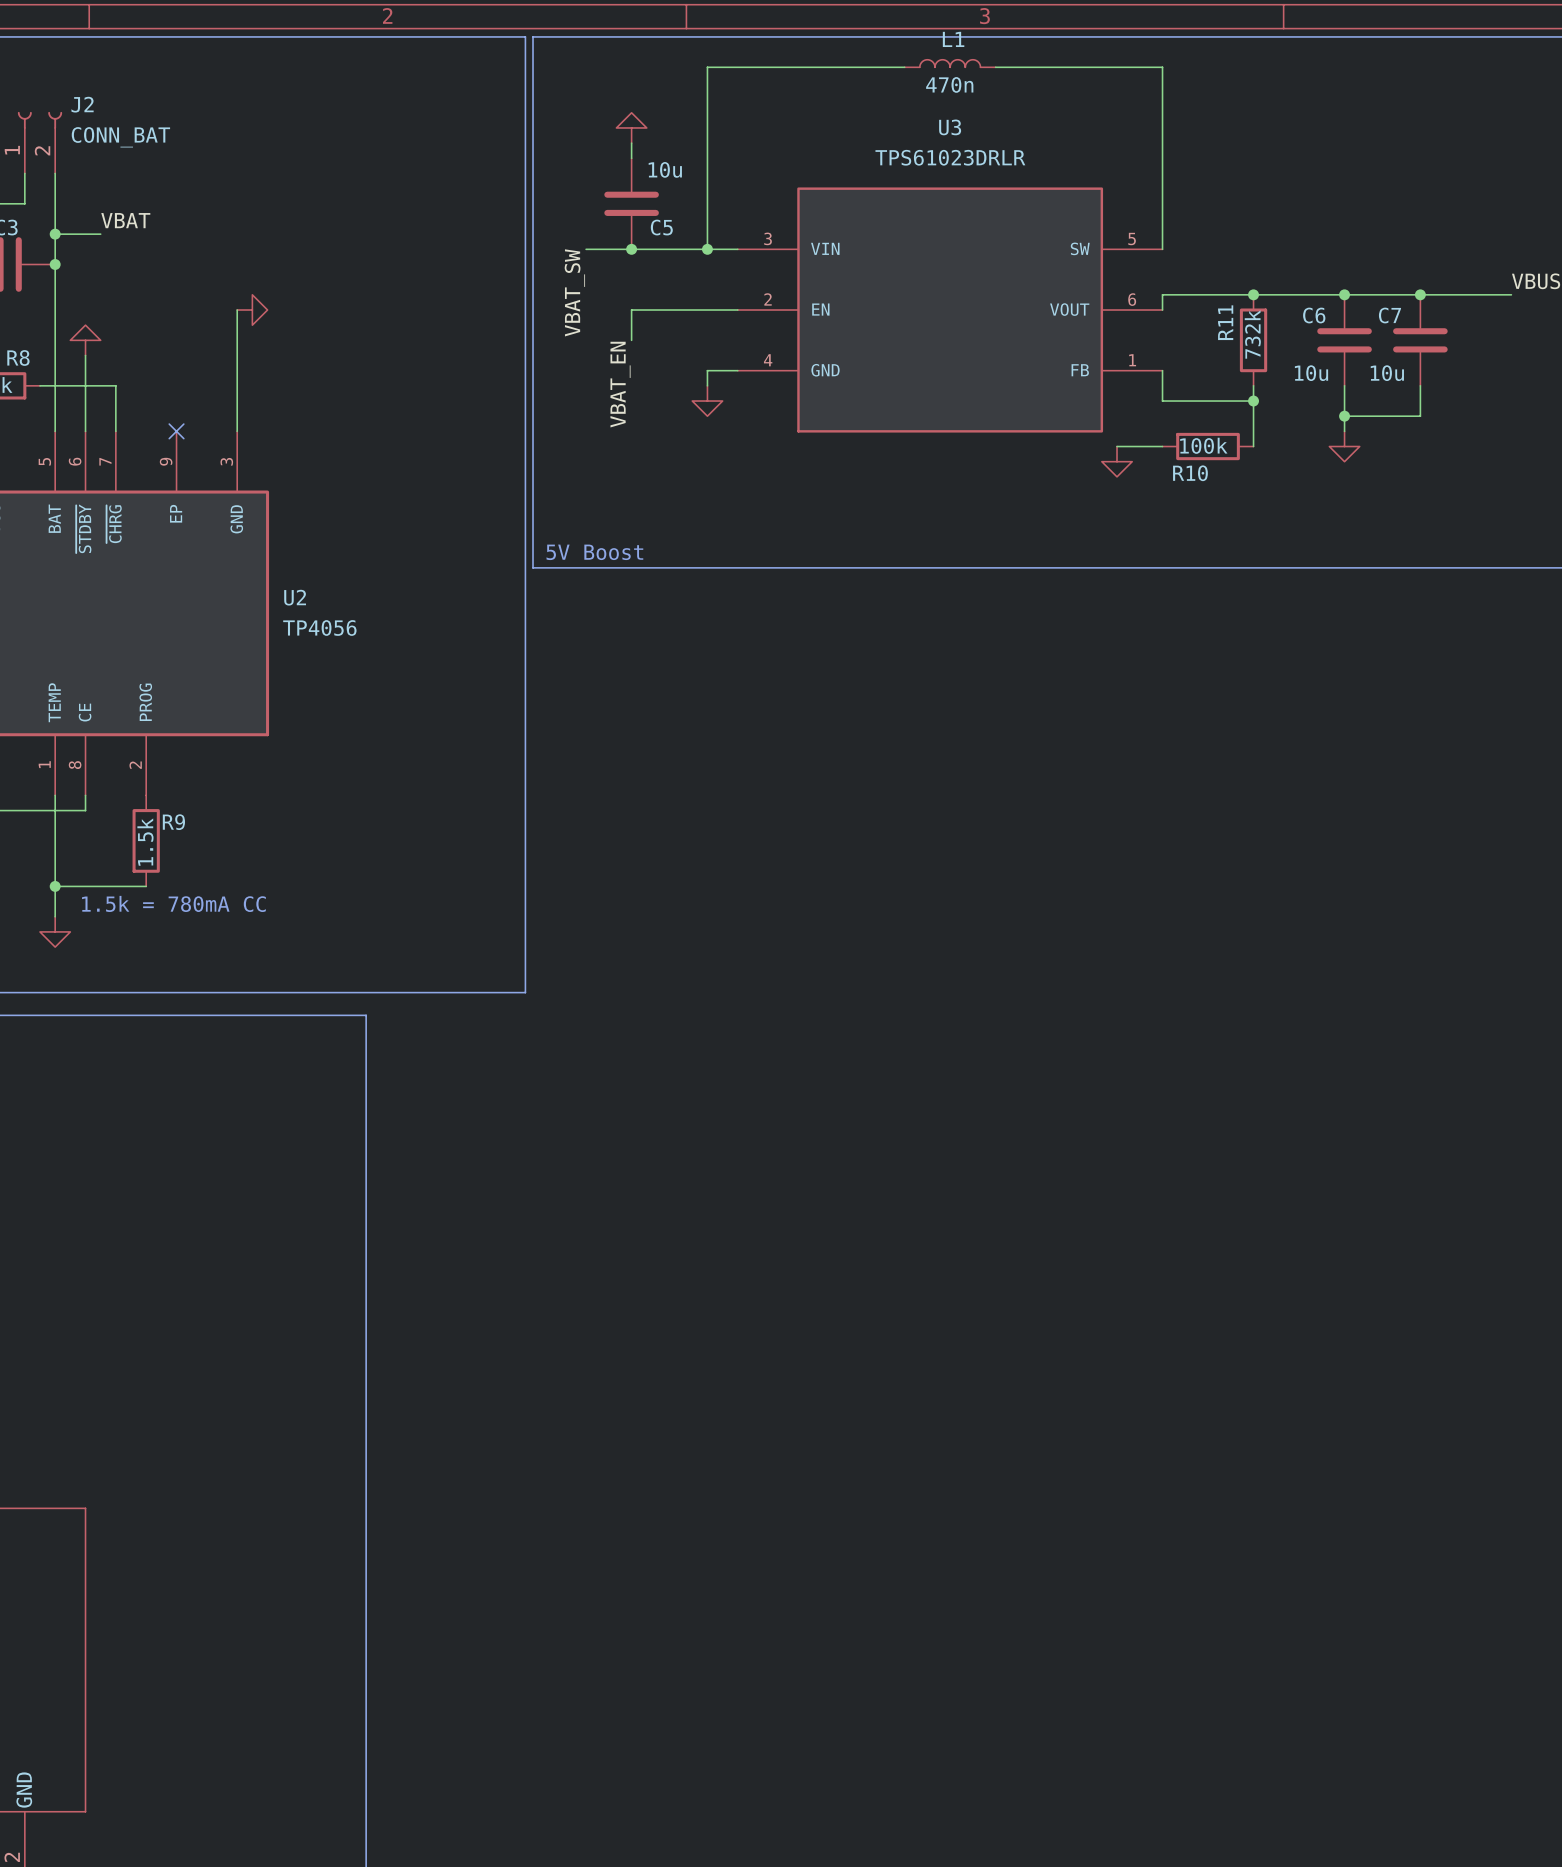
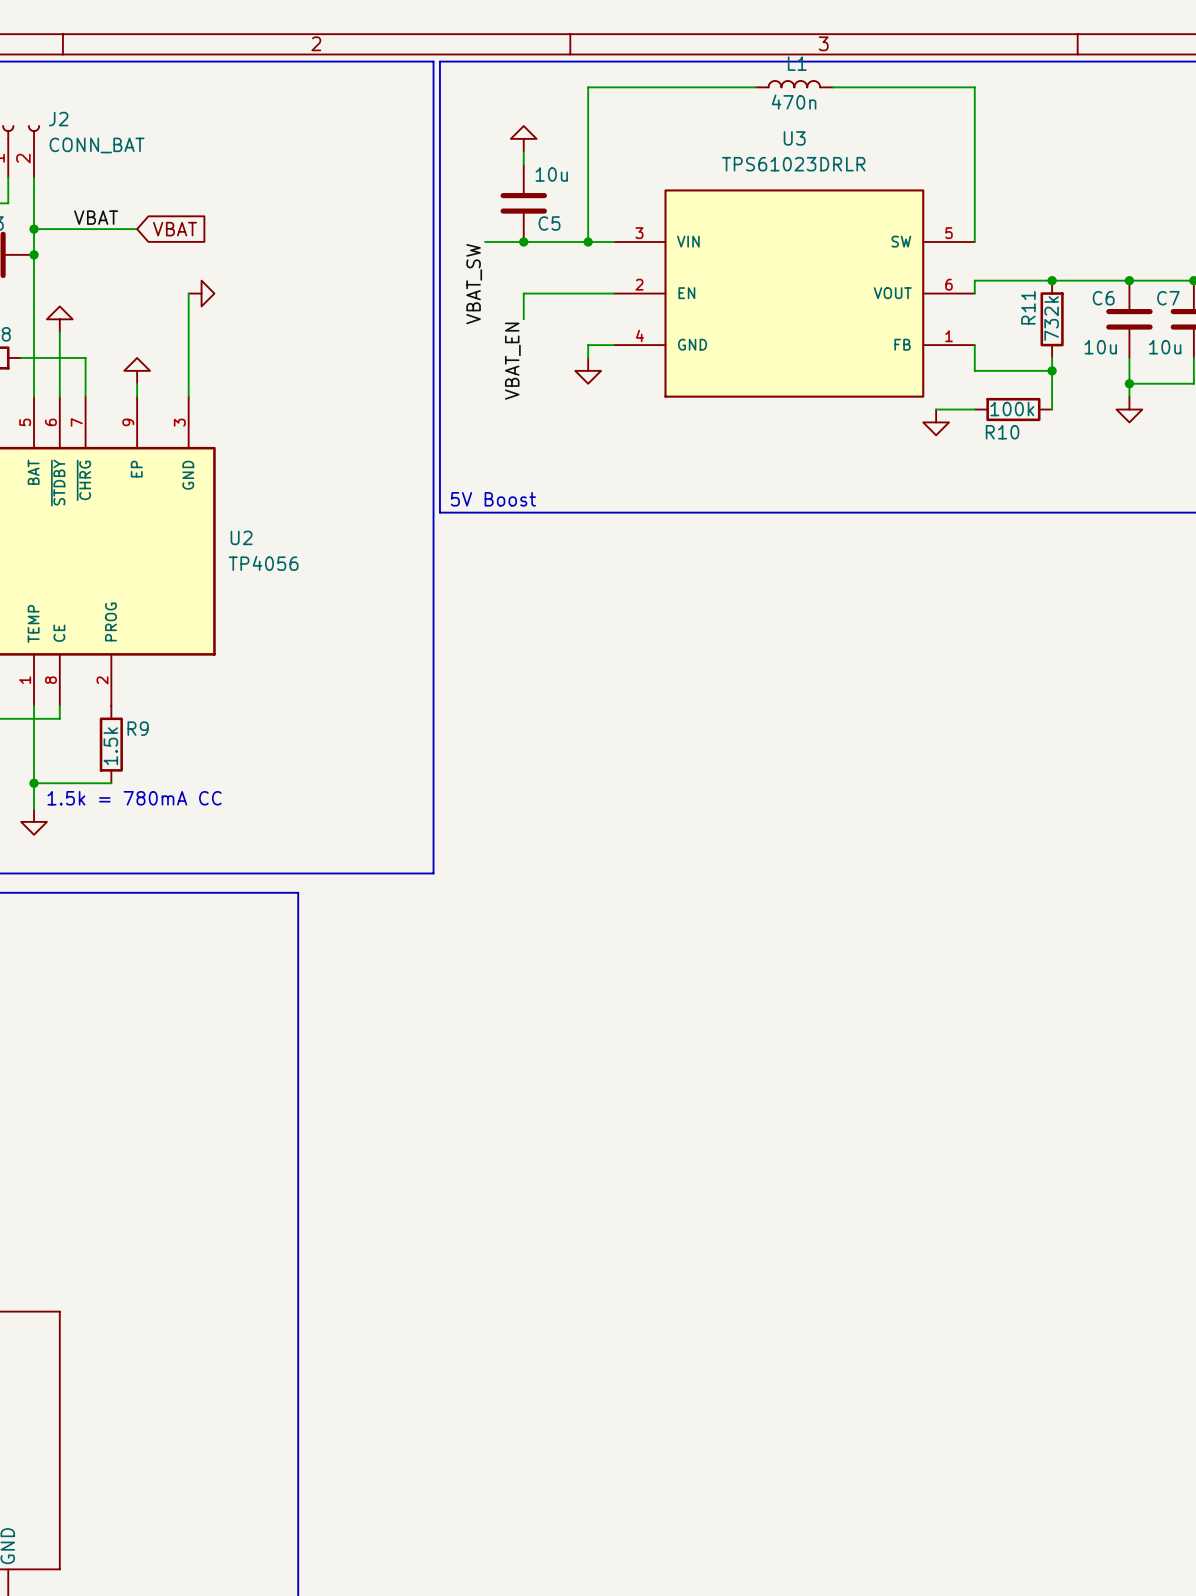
wire: none -> (72, 229) (137, 229)
global label: none -> VBAT (175, 229)
power symbol: none -> (137, 370)
wire: none -> (137, 383) (137, 396)
no-connect mark: (176, 431) -> none

